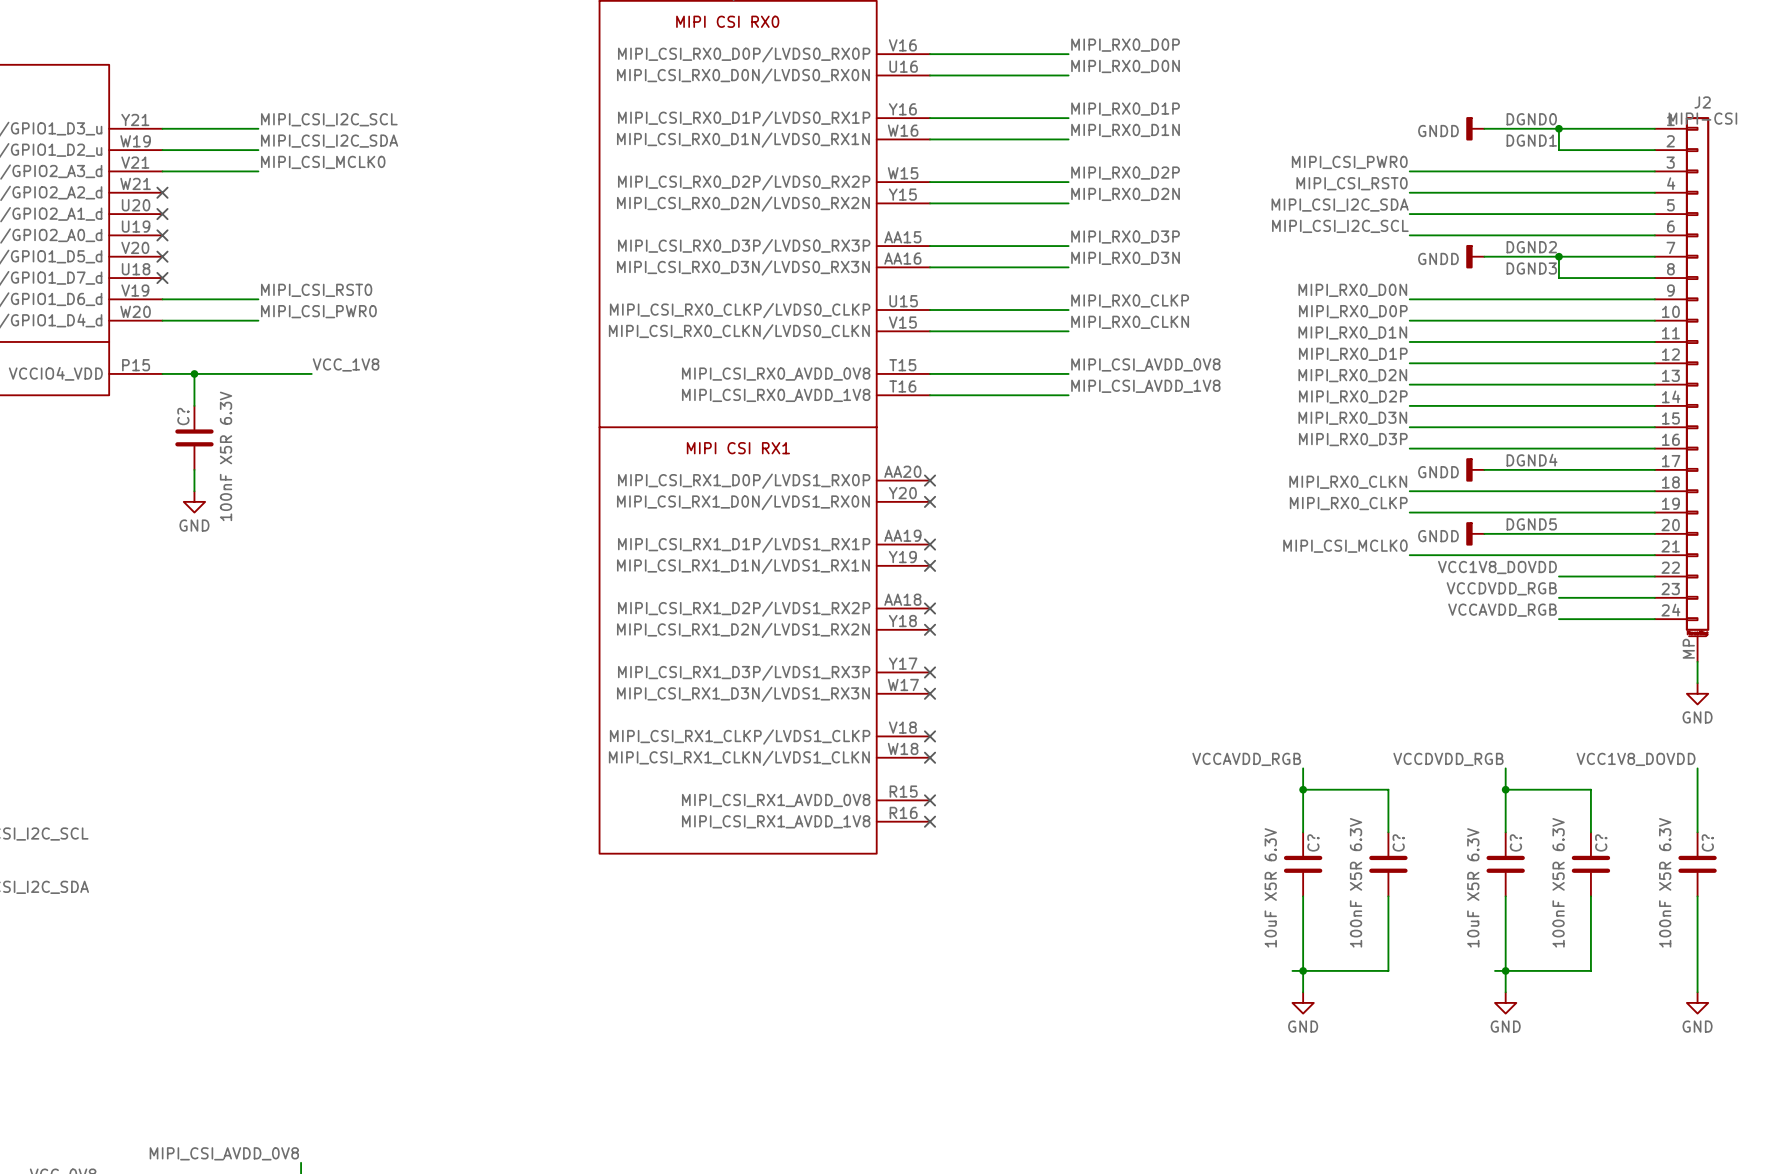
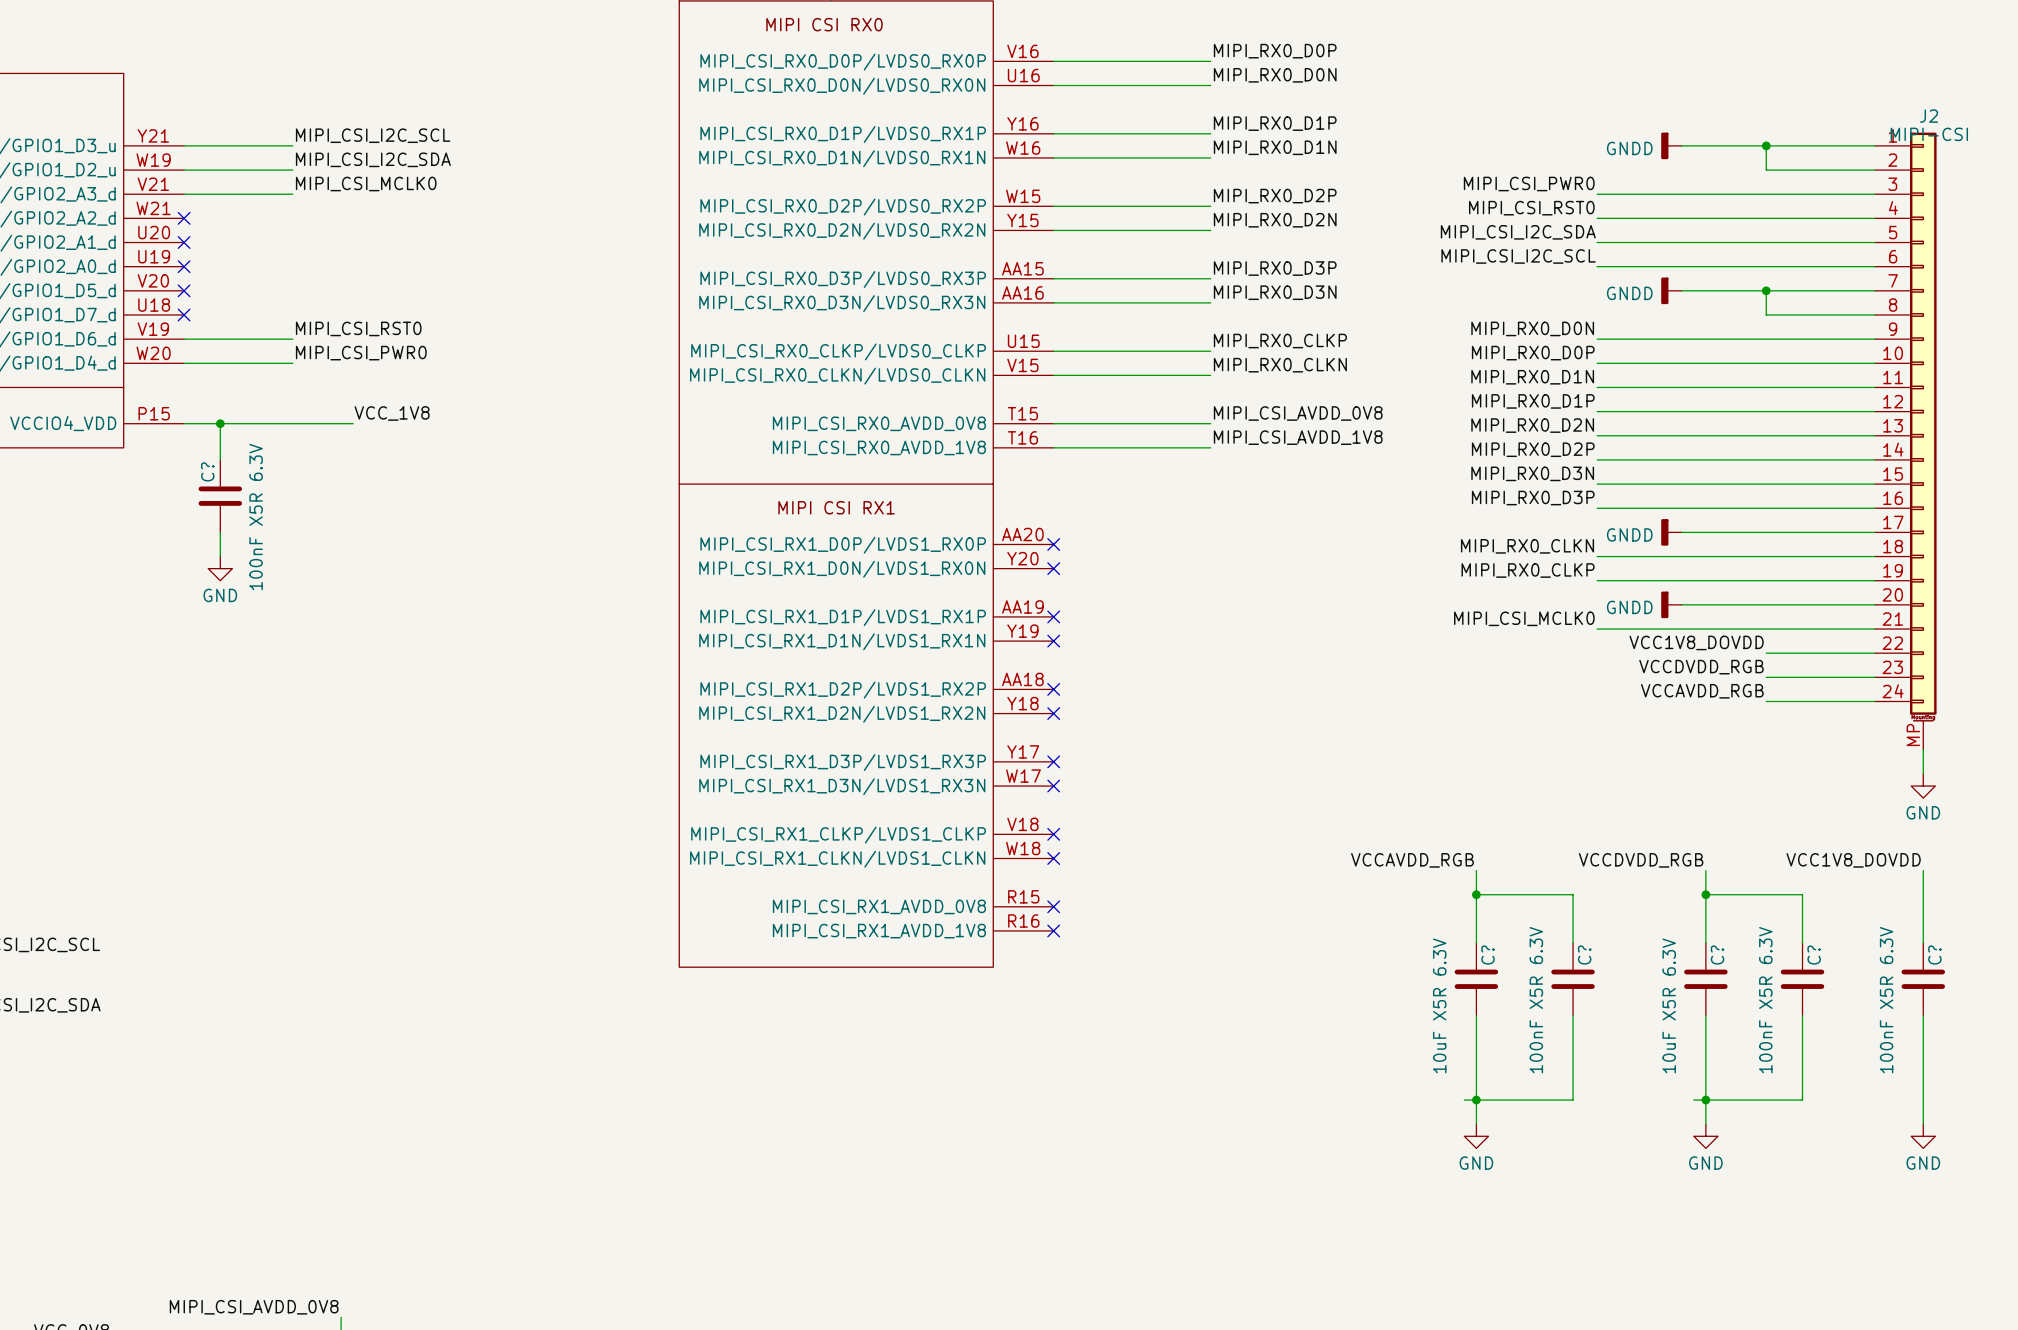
label: DGND0 (1531, 119) -> none
label: DGND1 (1531, 140) -> none
label: DGND2 (1531, 247) -> none
label: DGND3 (1531, 268) -> none
label: DGND4 (1531, 460) -> none
label: DGND5 (1531, 524) -> none

